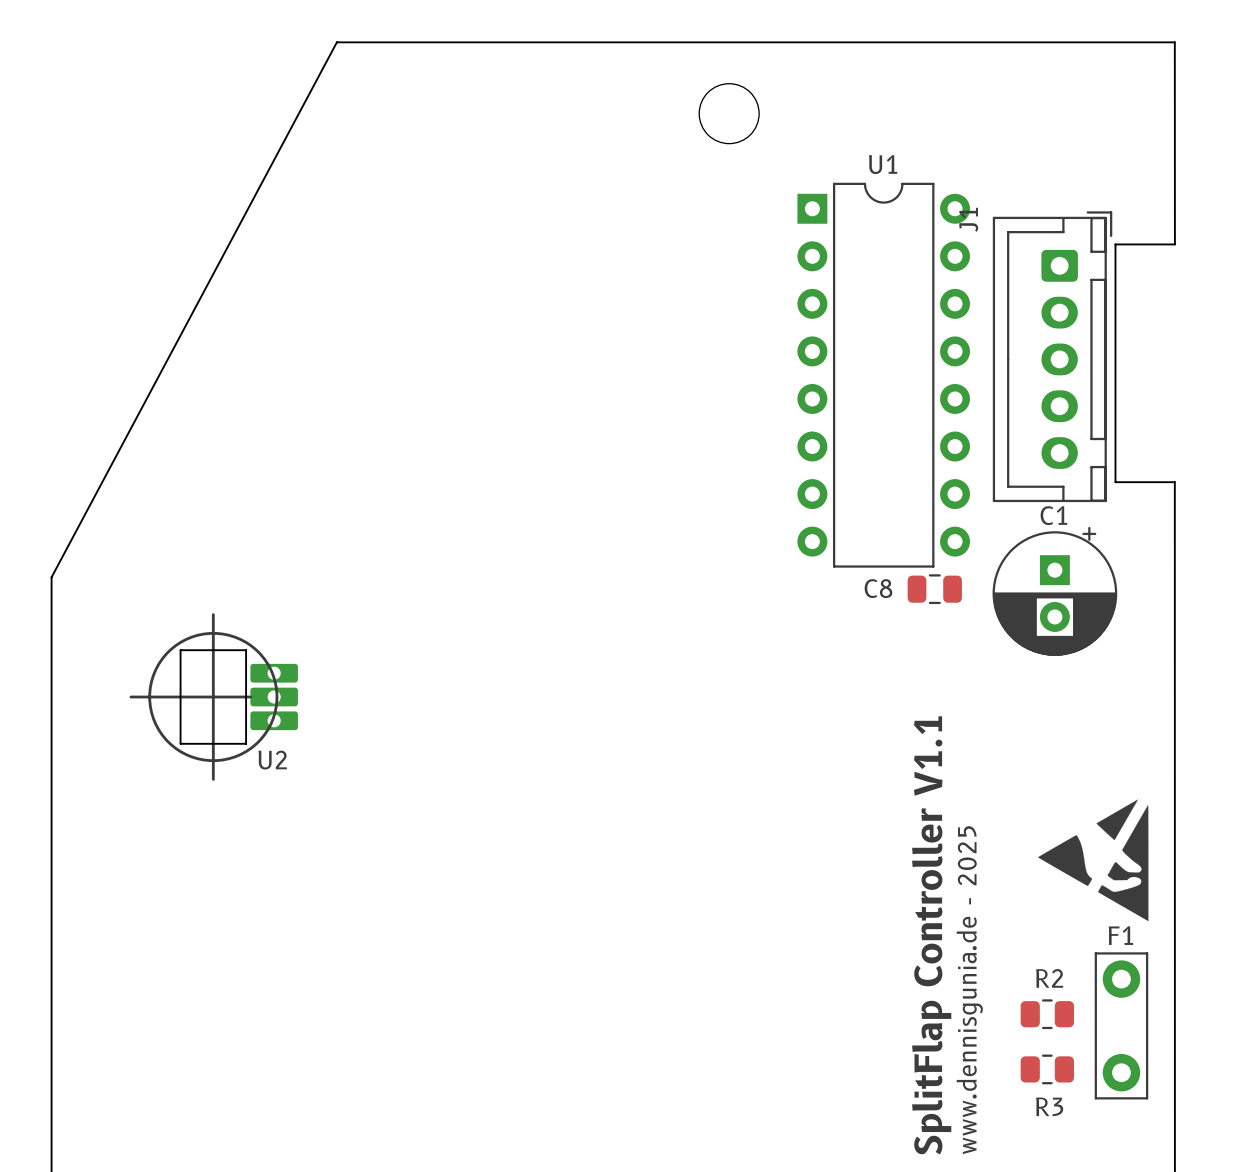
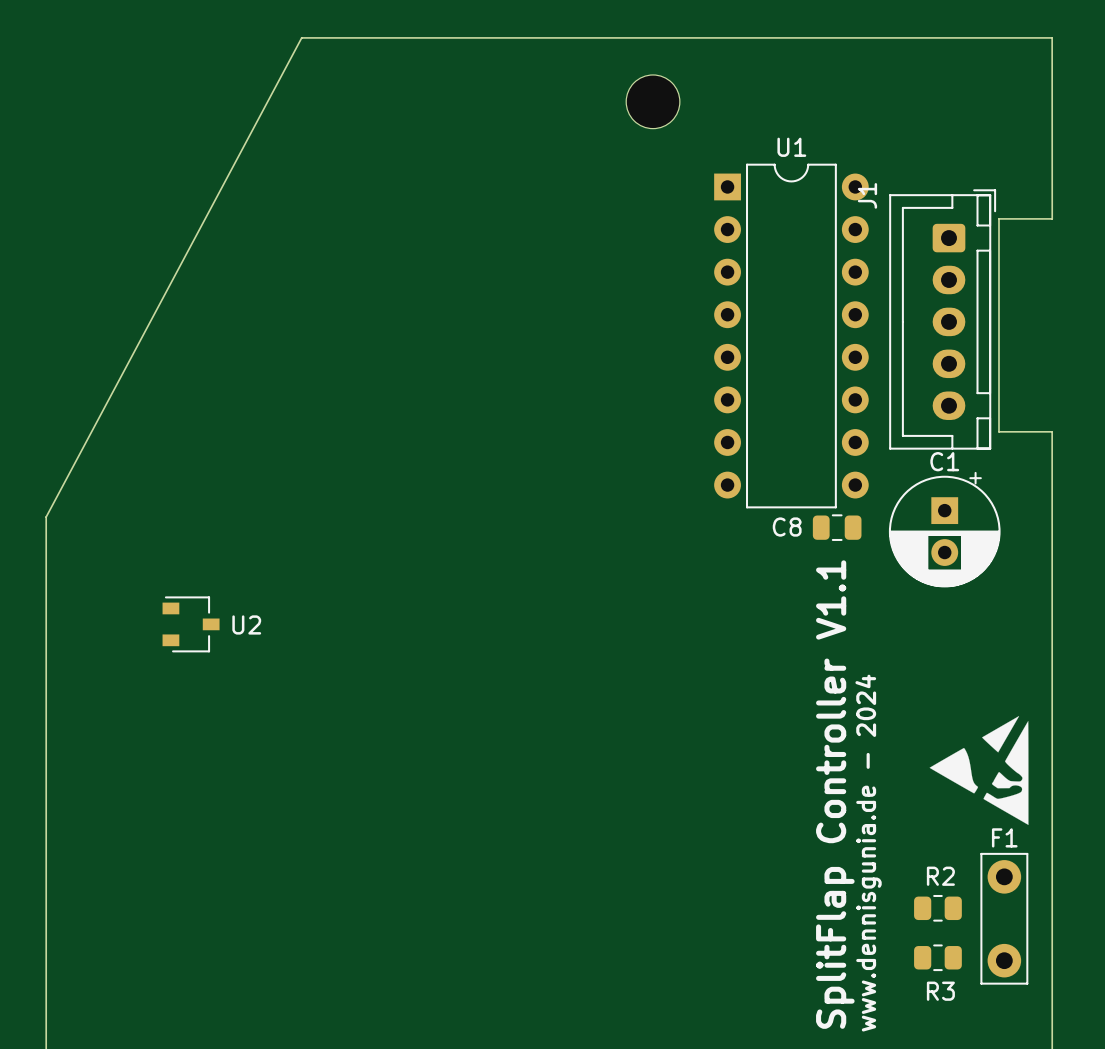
line: (213, 614) (213, 779) -> none
drawing: [148, 631, 279, 763] -> none
U2 footprint: [179, 649, 298, 745] -> [162, 596, 220, 653]
line: (130, 697) (250, 697) -> none
U2 name position: U2 (272, 760) -> U2 (246, 624)
text: www.dennisgunia.de - 2025 (969, 990) -> www.dennisgunia.de - 2024 (868, 853)

